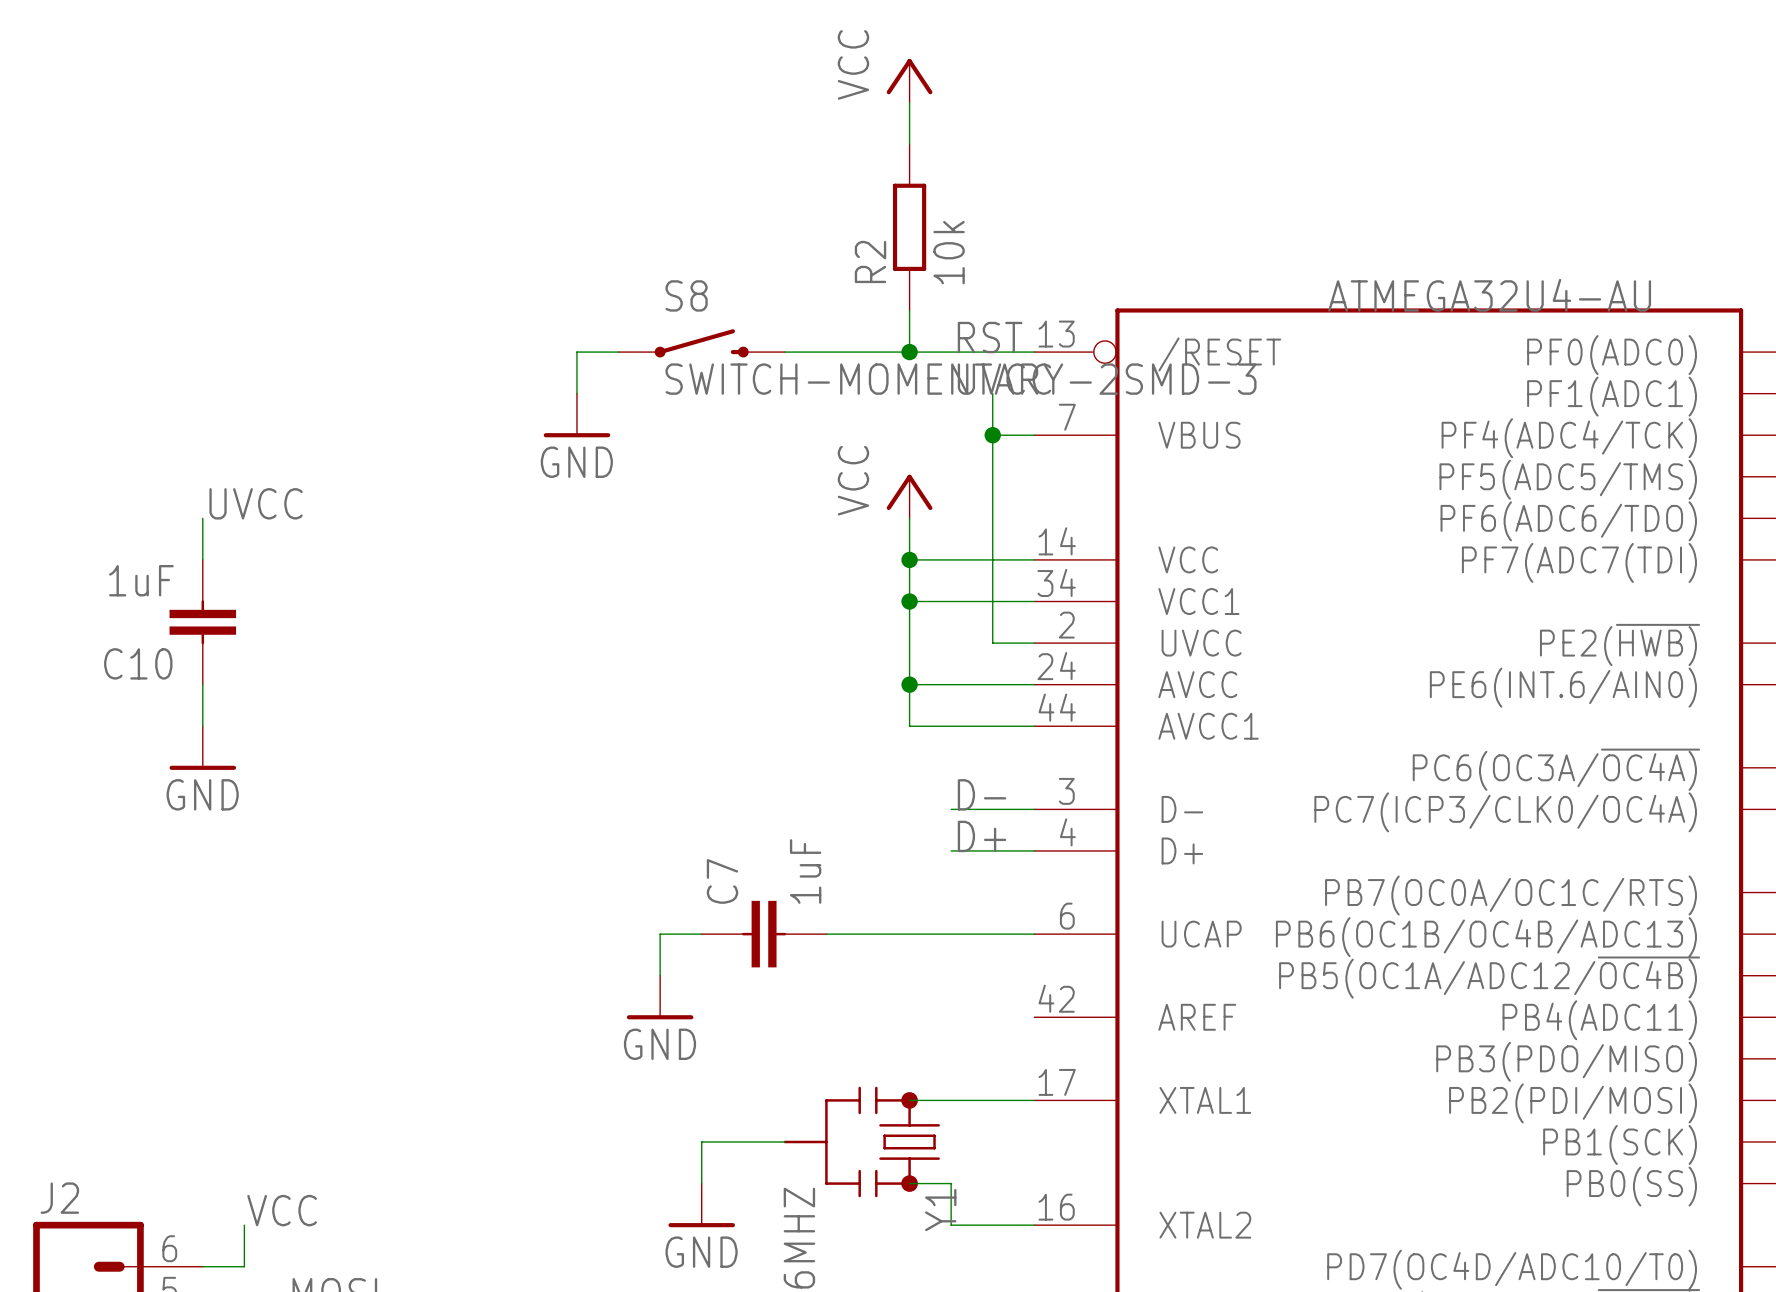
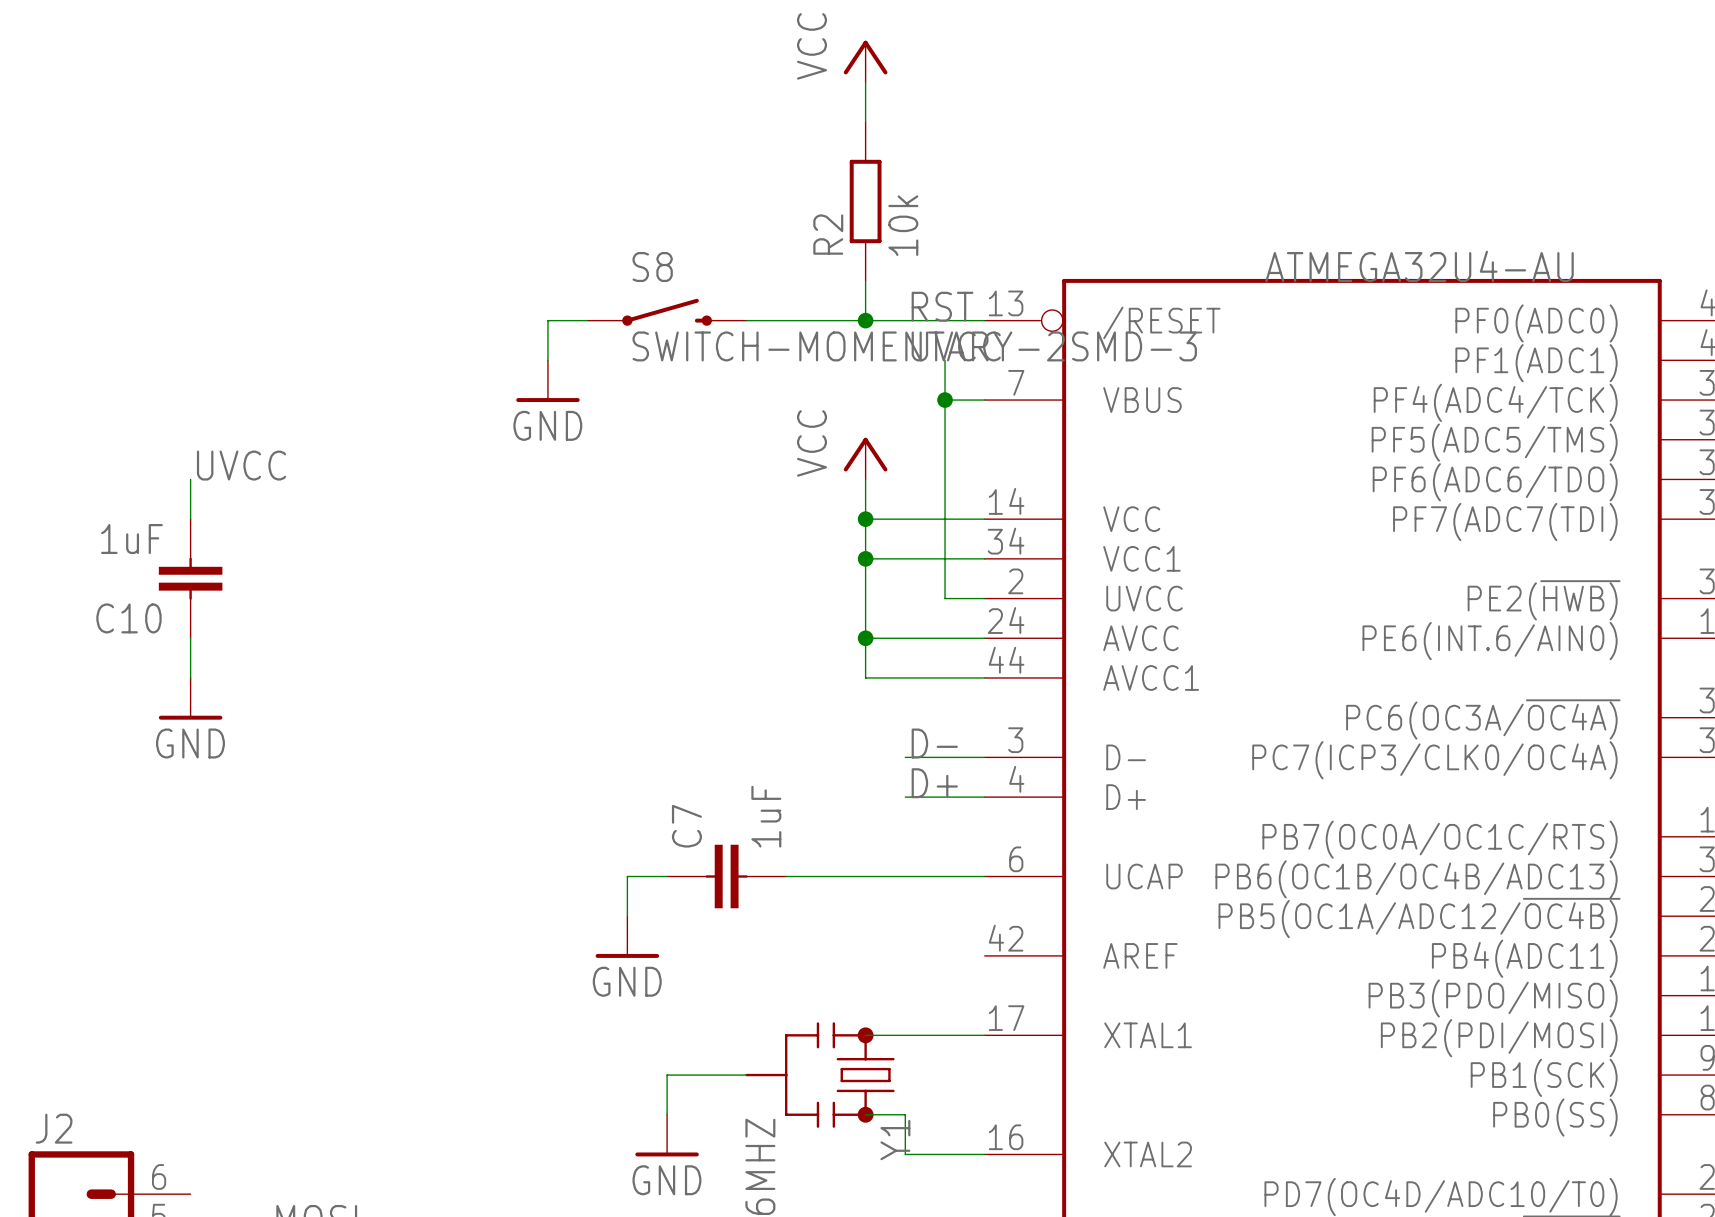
label: VCC (282, 1210) -> none
wire: (244, 1225) (244, 1266) (202, 1266) -> none

